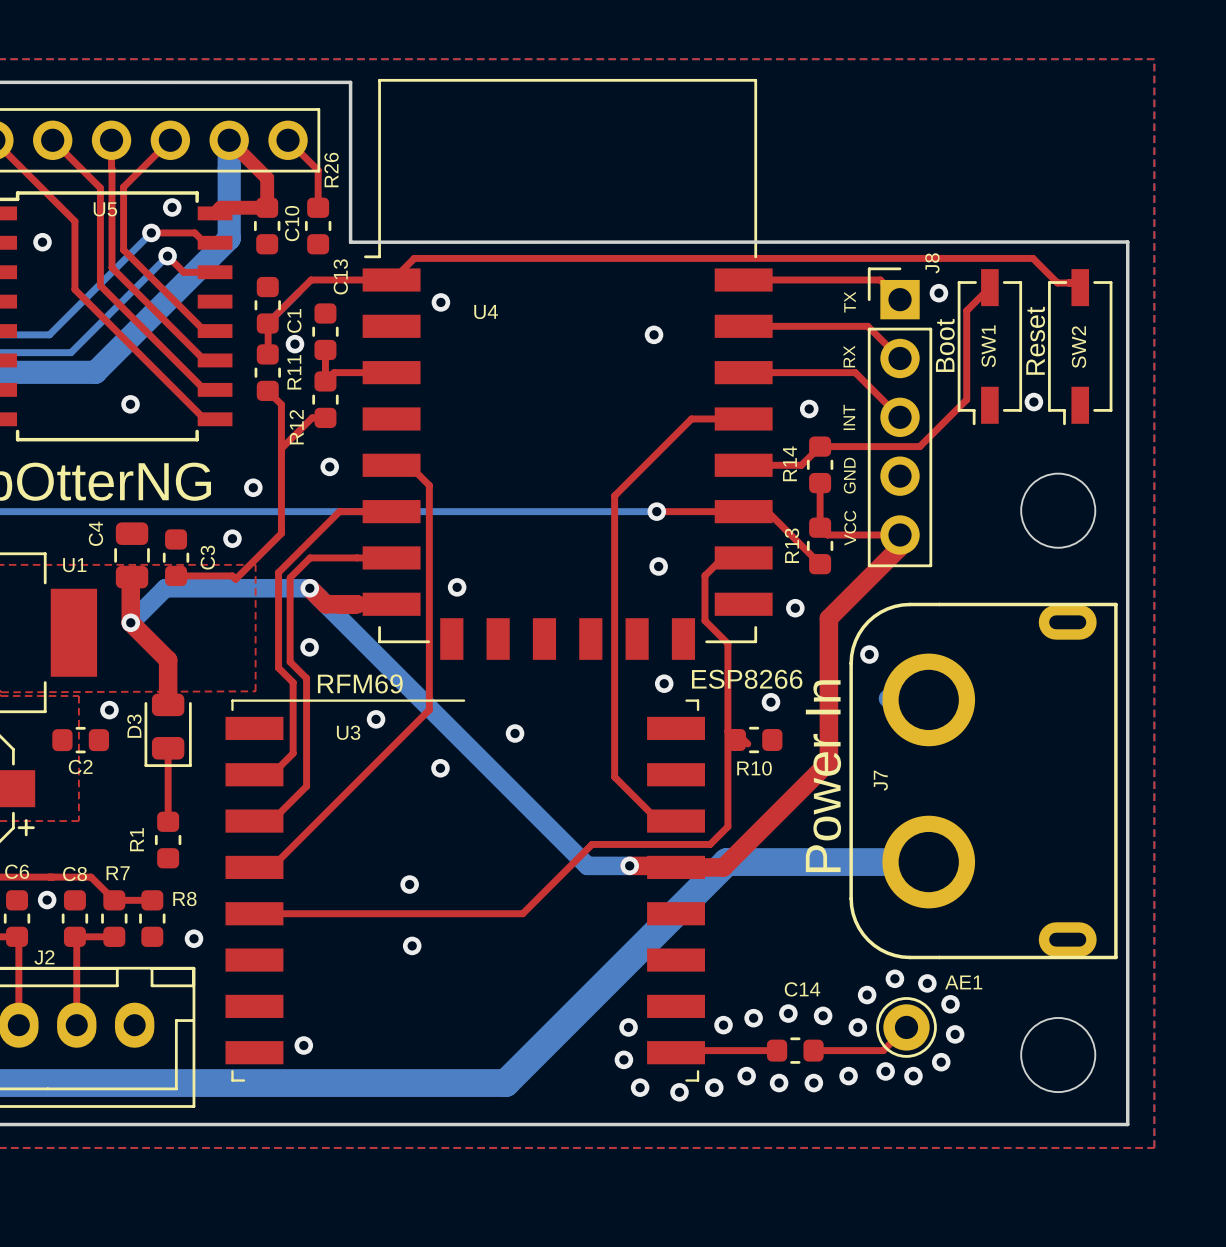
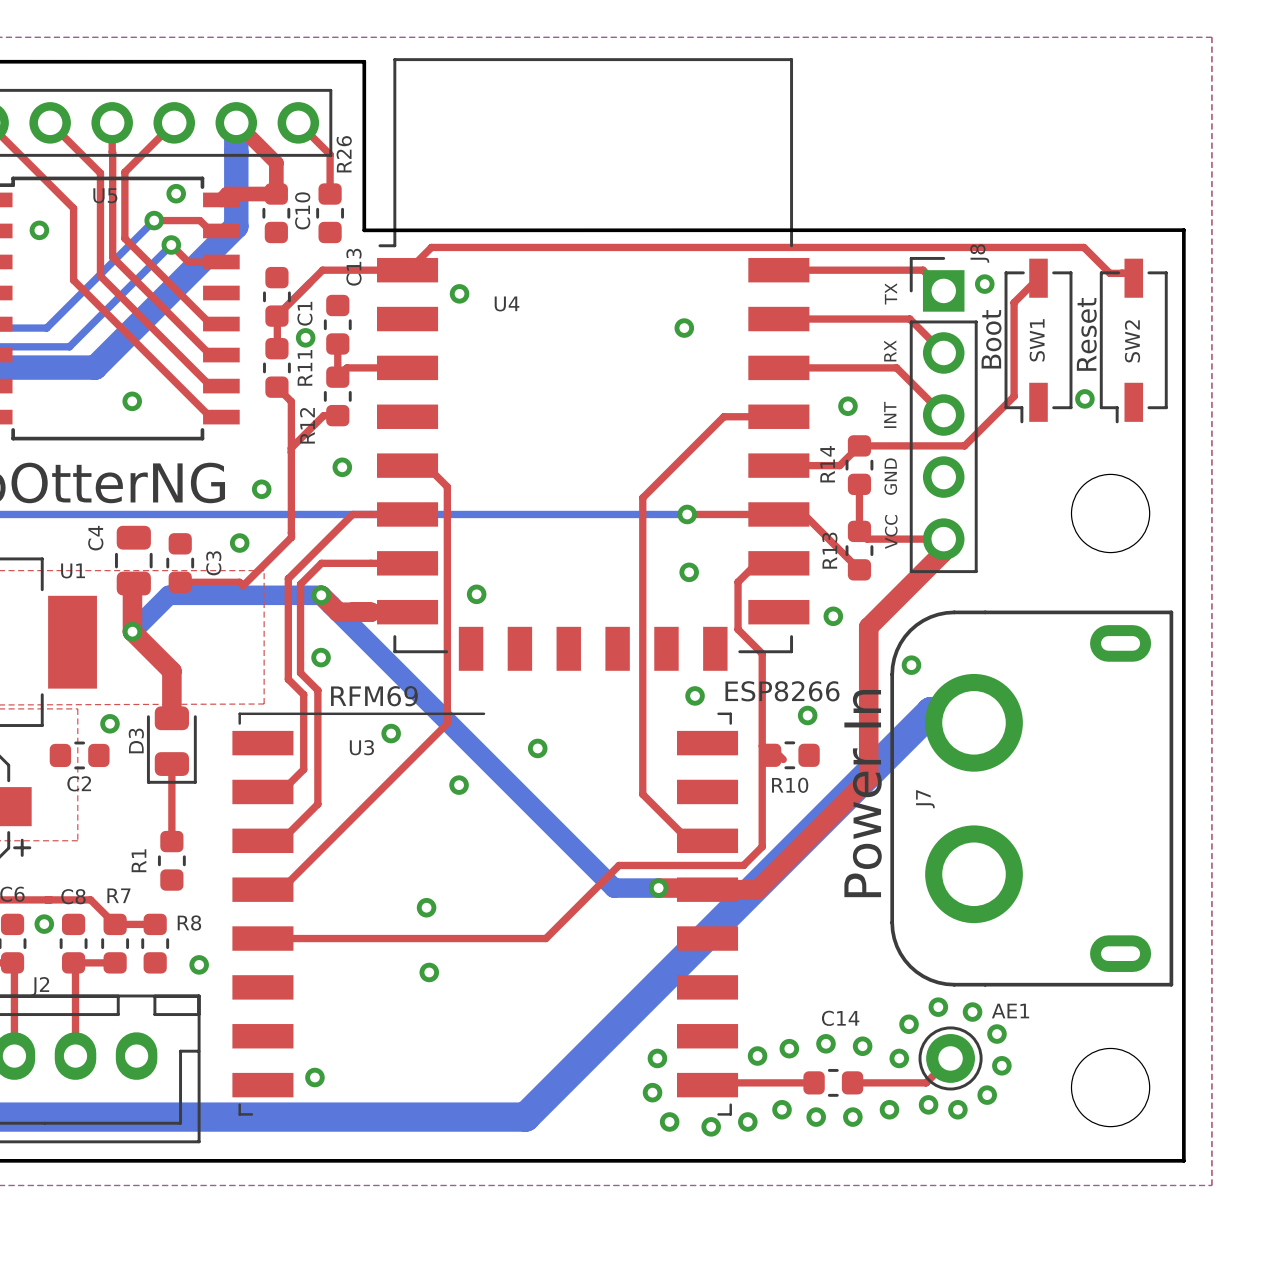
J7 footprint: [849, 602, 1118, 960] -> [890, 610, 1174, 987]
bottom track: (928, 862) (726, 862) (505, 1083) (503, 1083) -> (972, 711) (931, 711) (525, 1117)

